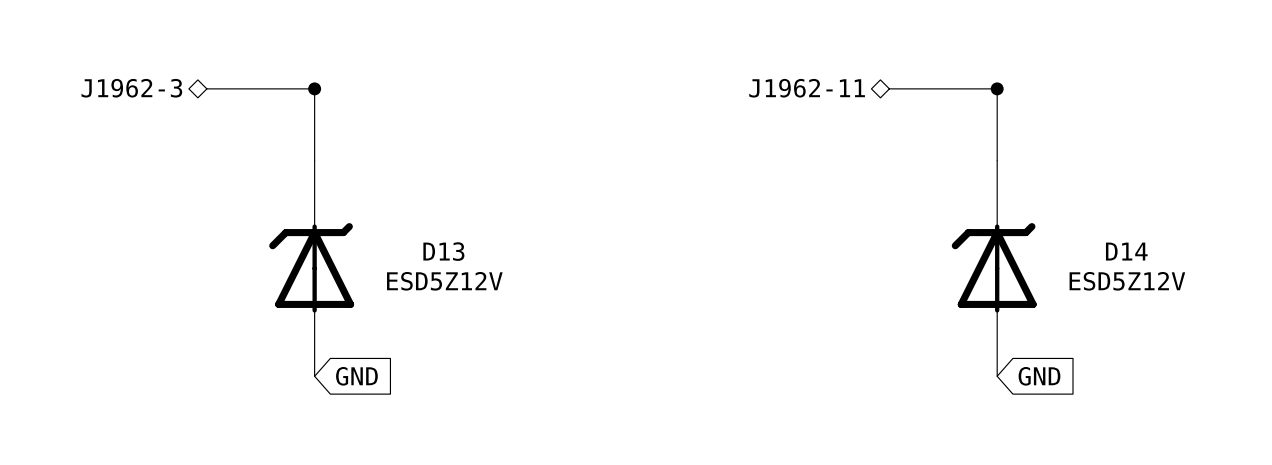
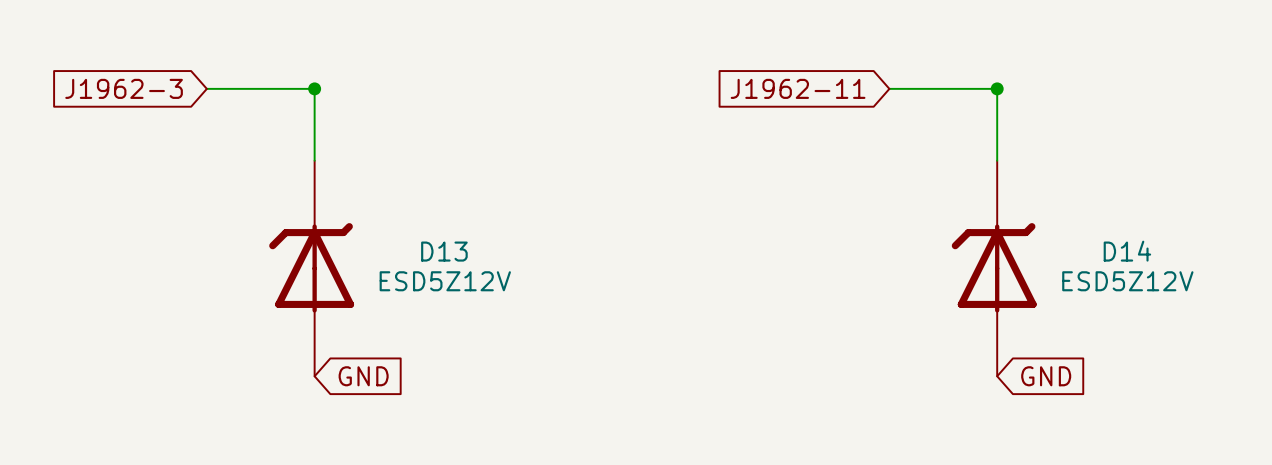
hierarchical label: J1962-3 (131, 88) -> none
global label: none -> J1962-3 (124, 88)
hierarchical label: J1962-11 (807, 88) -> none
global label: none -> J1962-11 (798, 88)

